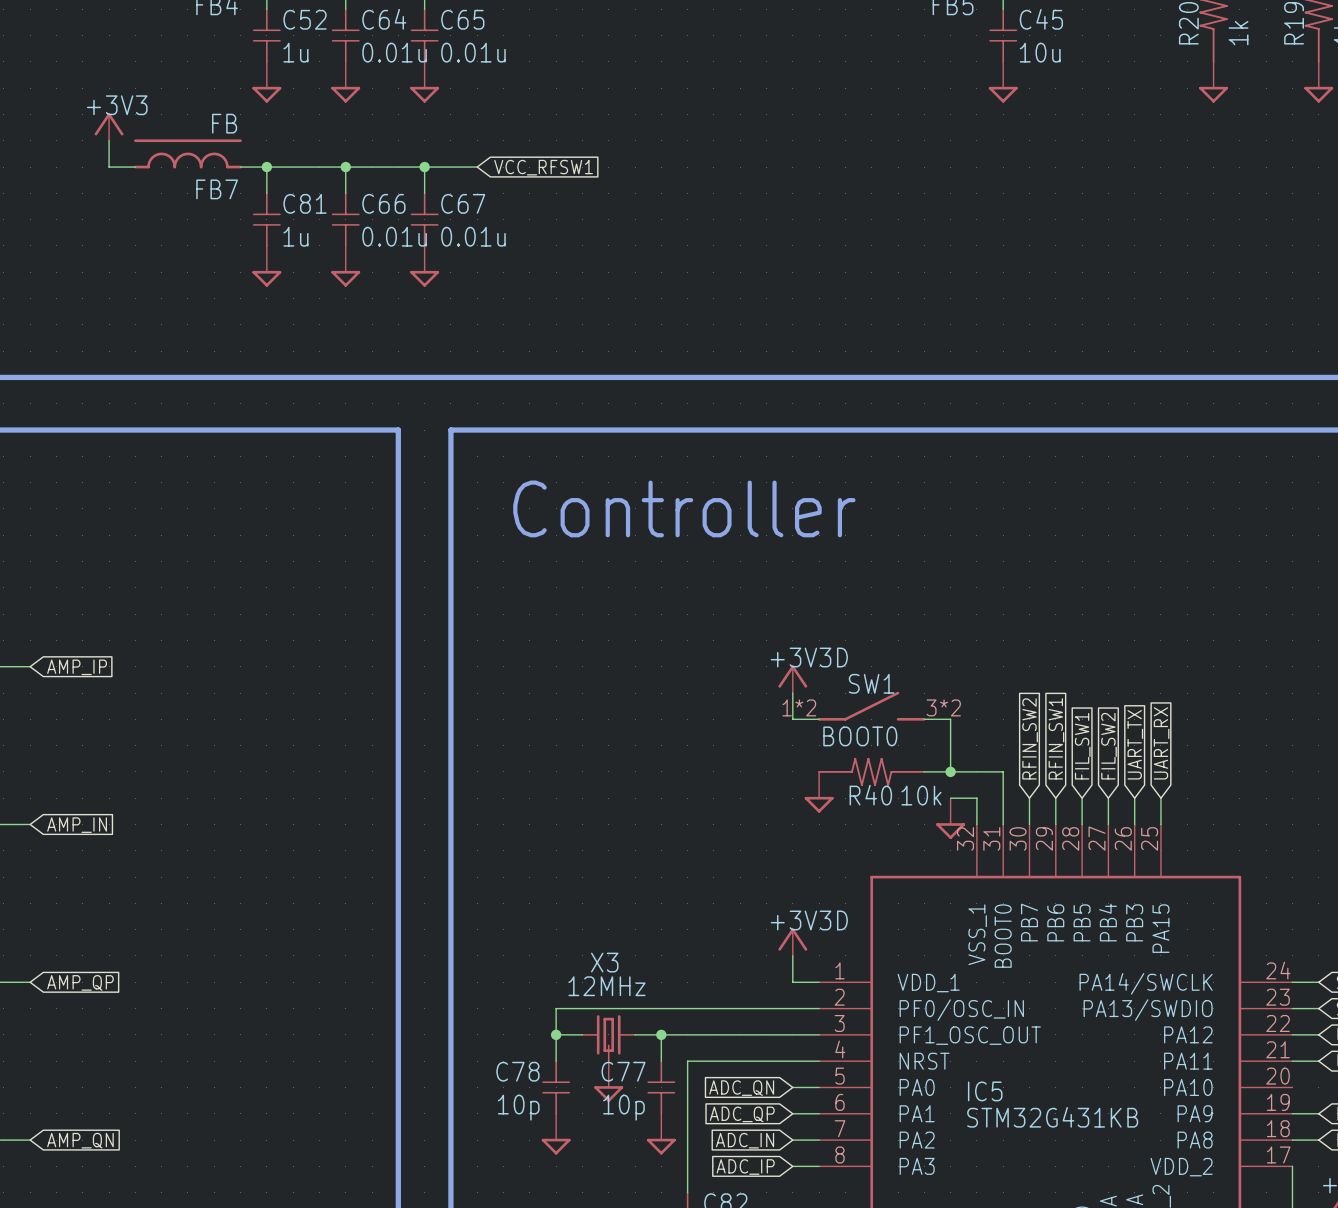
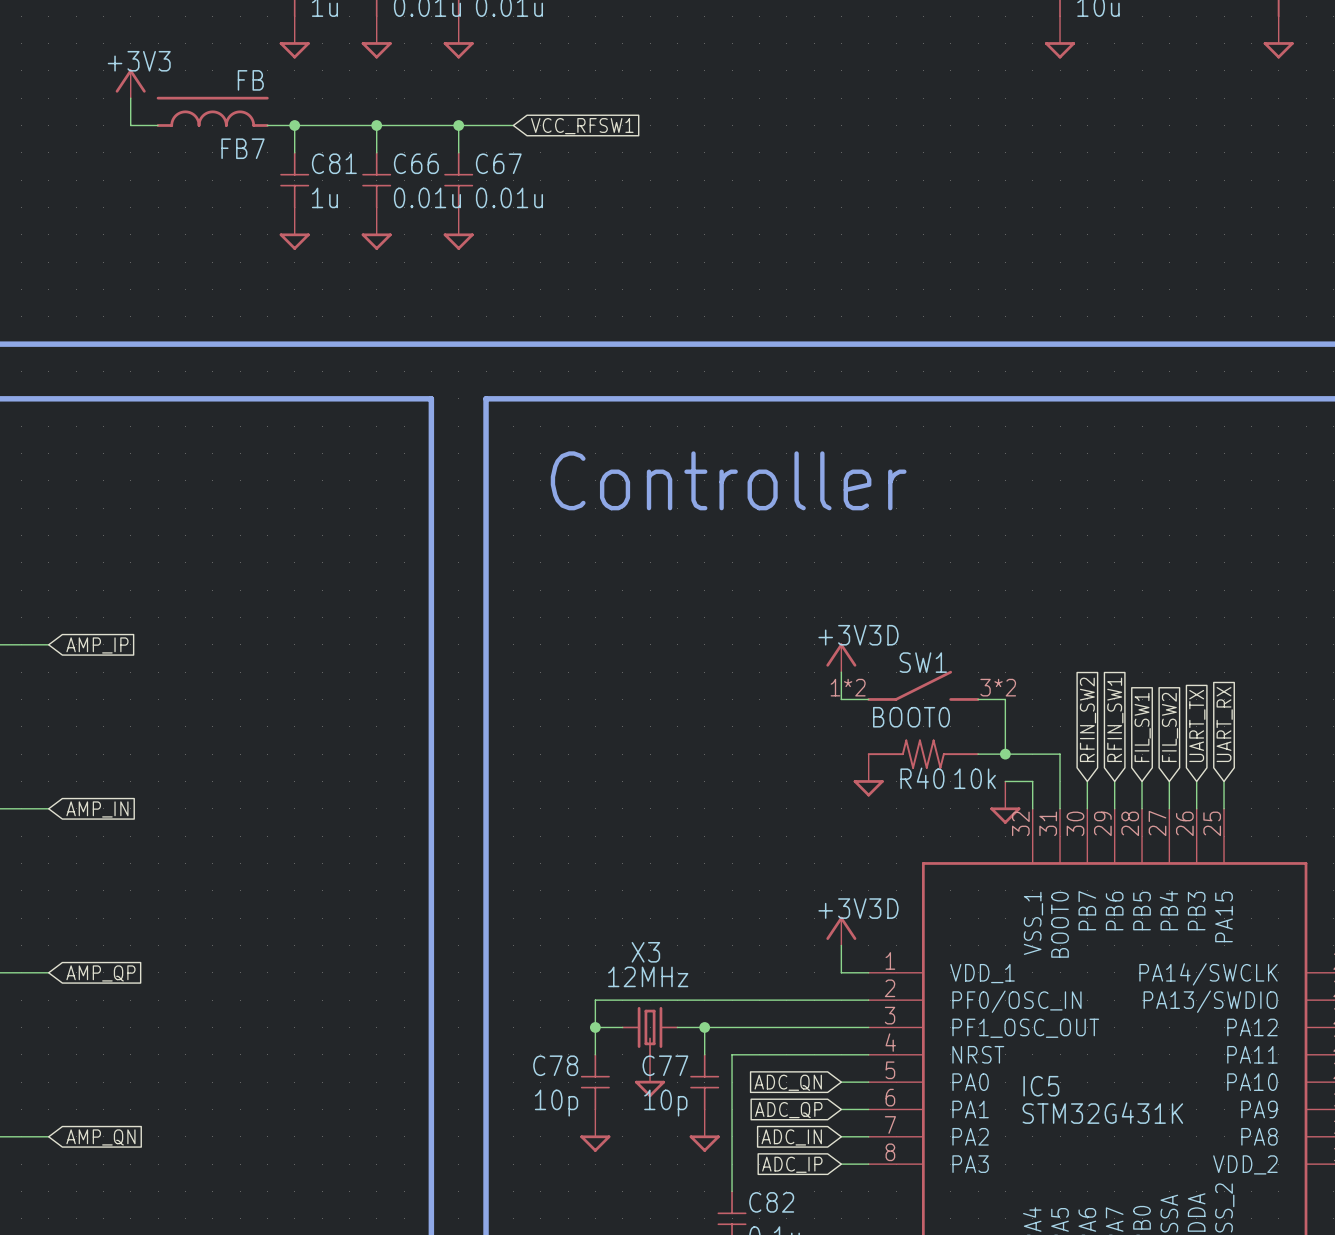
IC5 value: STM32G431KB (1052, 1117) -> STM32G431K (1102, 1113)

